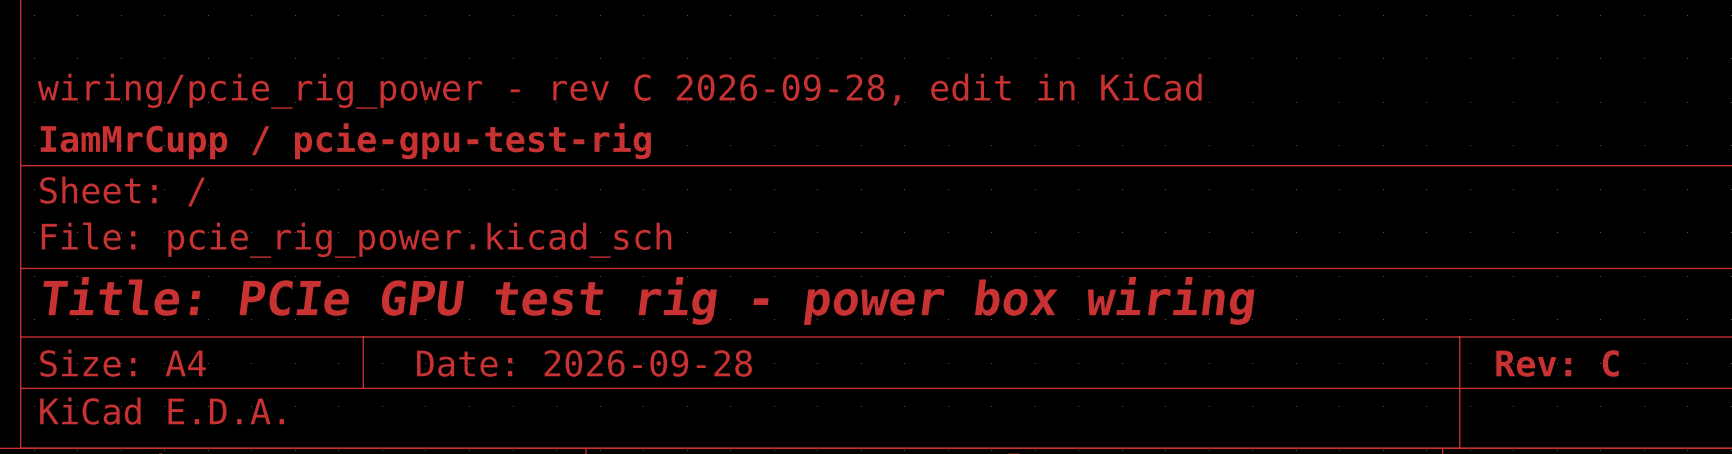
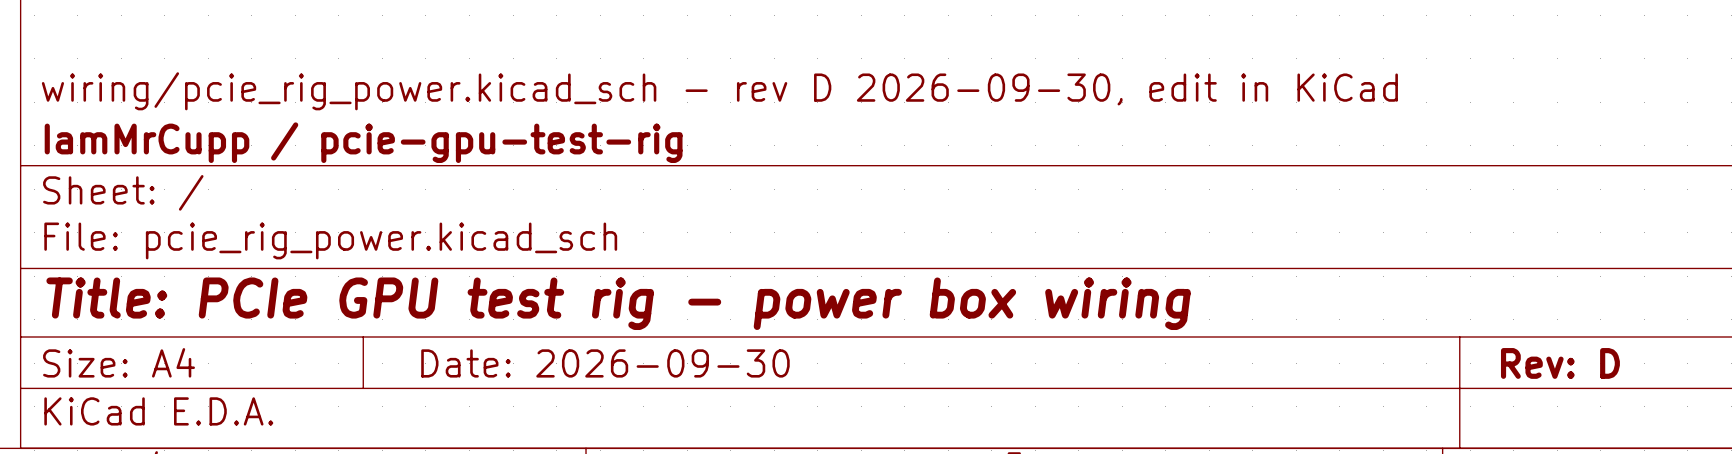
title block: wiring/pcie_rig_power - rev C 2026-09-28, edit in KiCad (619, 91) -> wiring/pcie_rig_power.kicad_sch - rev D 2026-09-30, edit in KiCad (719, 91)
title block: Date: 2026-09-28 (584, 363) -> Date: 2026-09-30 (605, 363)
title block: Rev: C (1557, 363) -> Rev: D (1560, 363)

